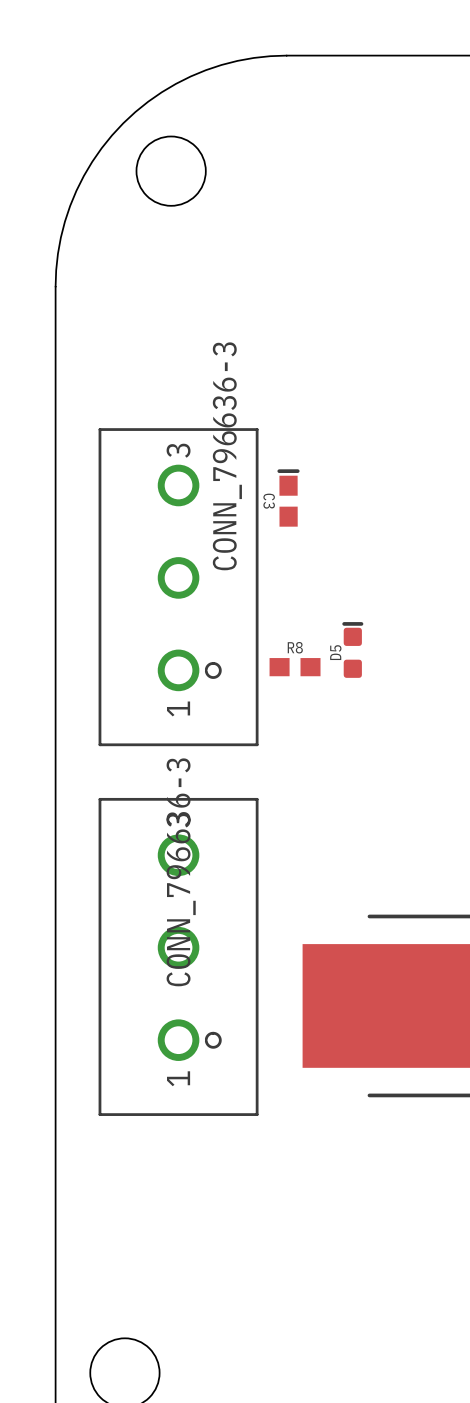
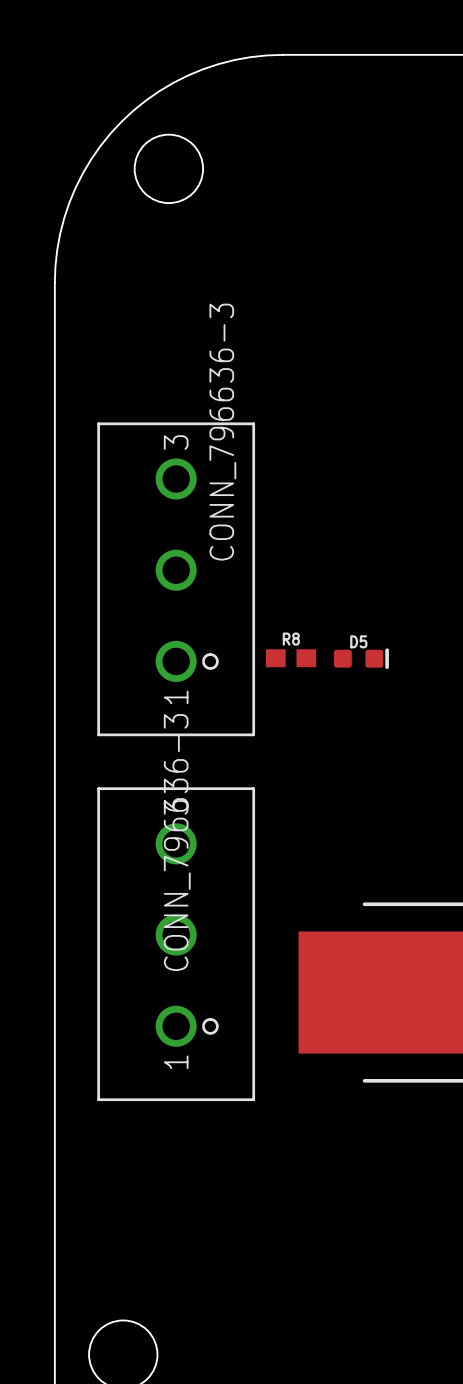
C3: (288, 497) -> none
D5 rotation: 0° (352, 649) -> 90° clockwise (361, 658)

